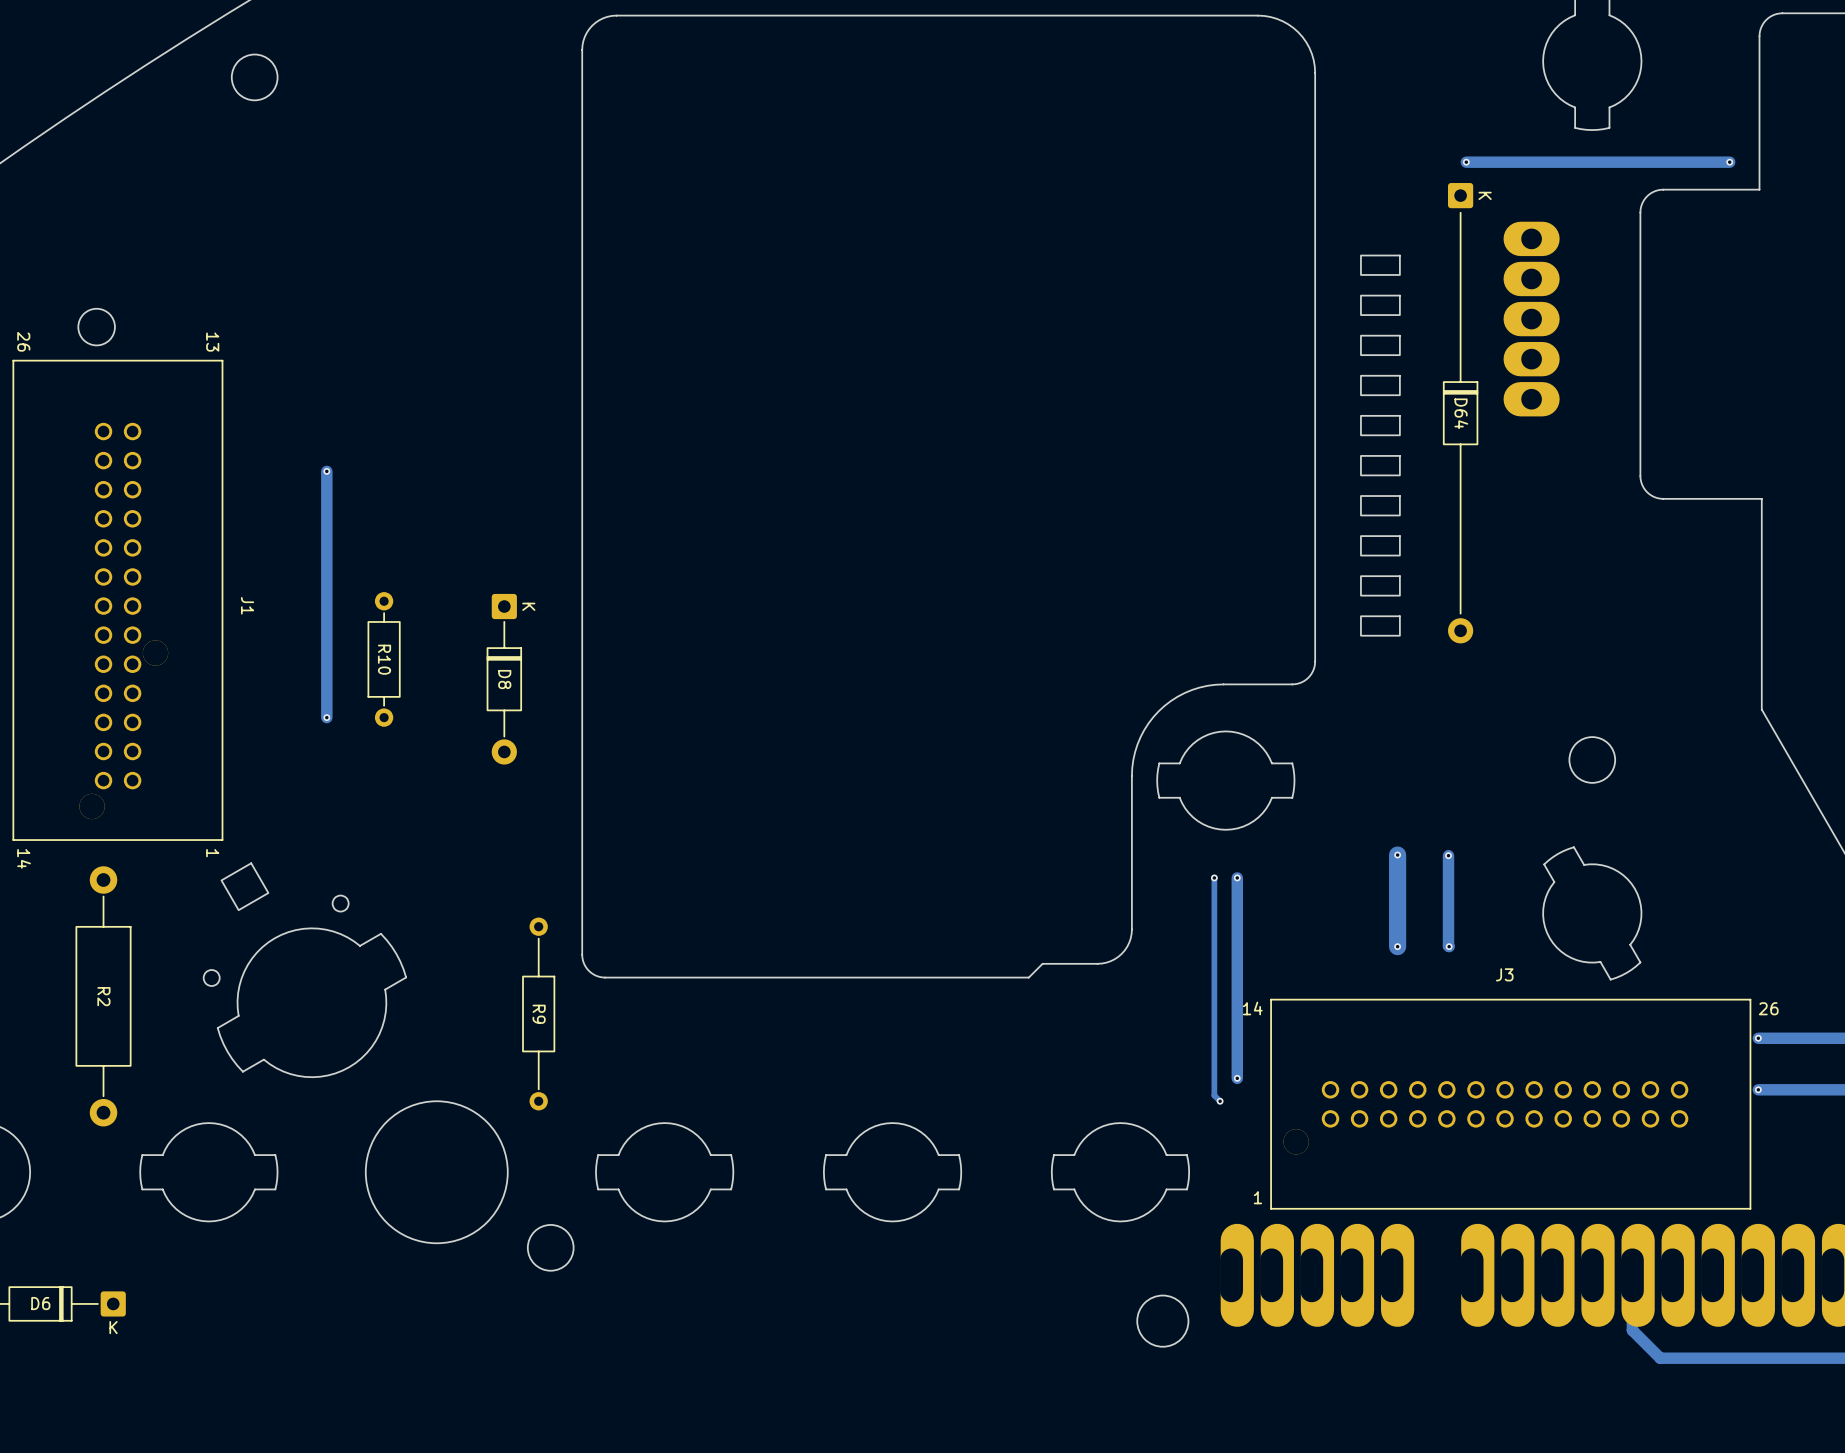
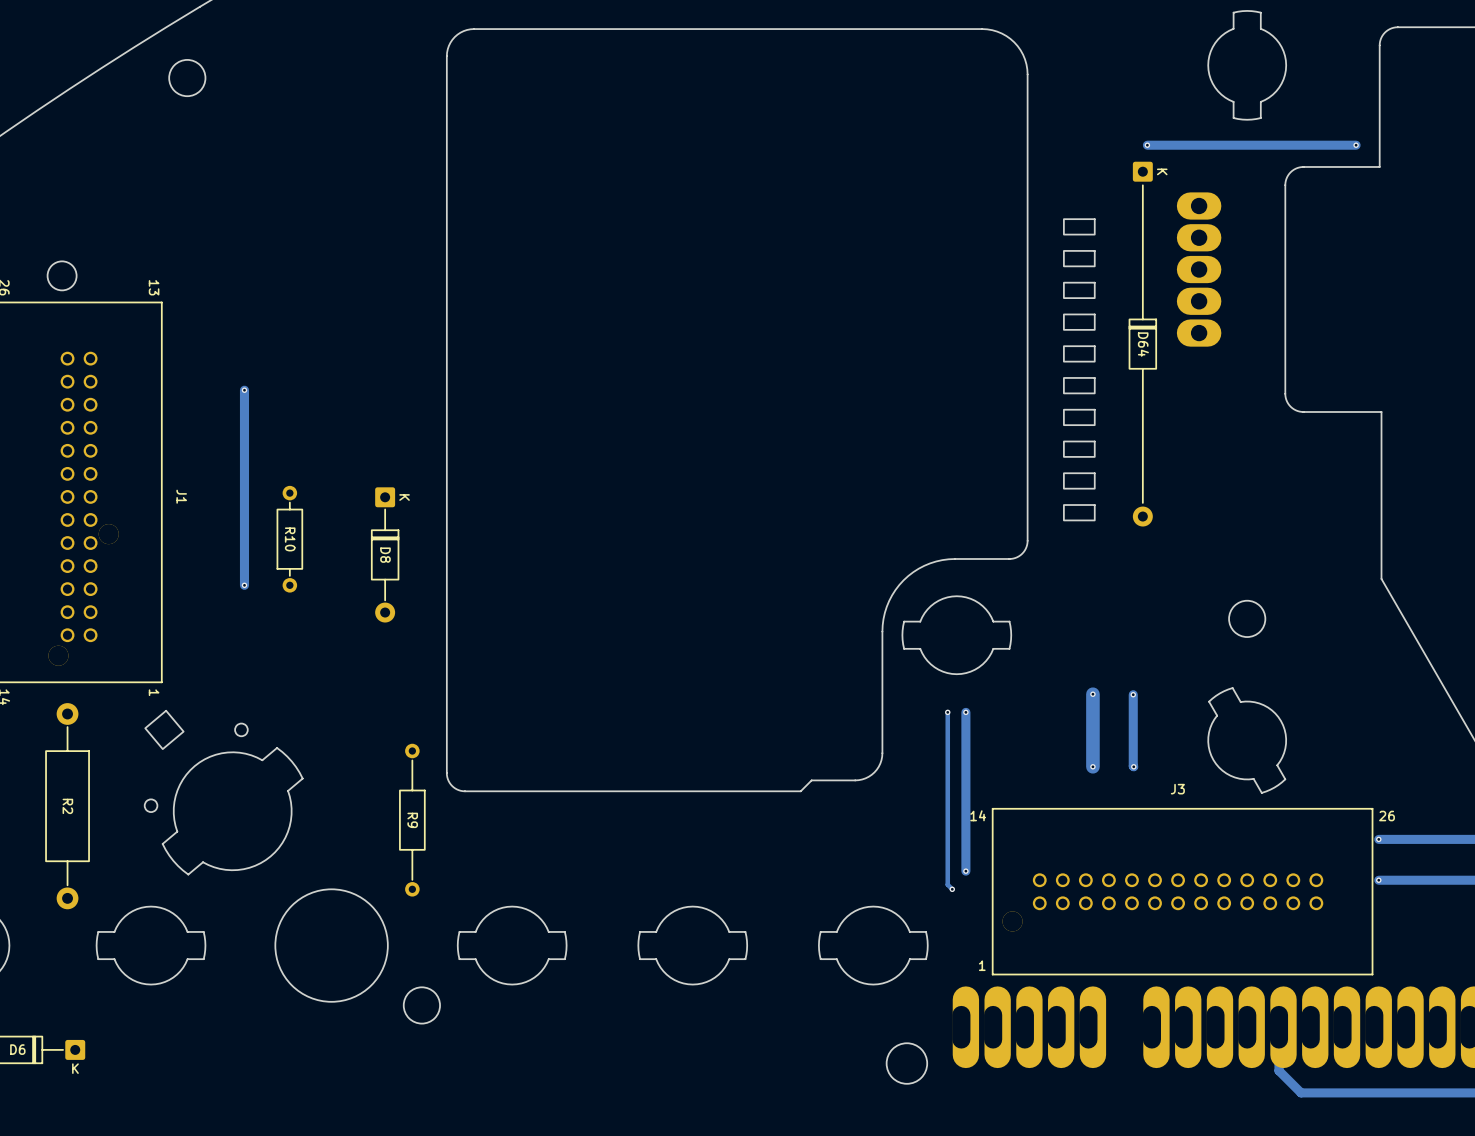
part rotation: 0° (305, 970) -> 10° counterclockwise (223, 792)

